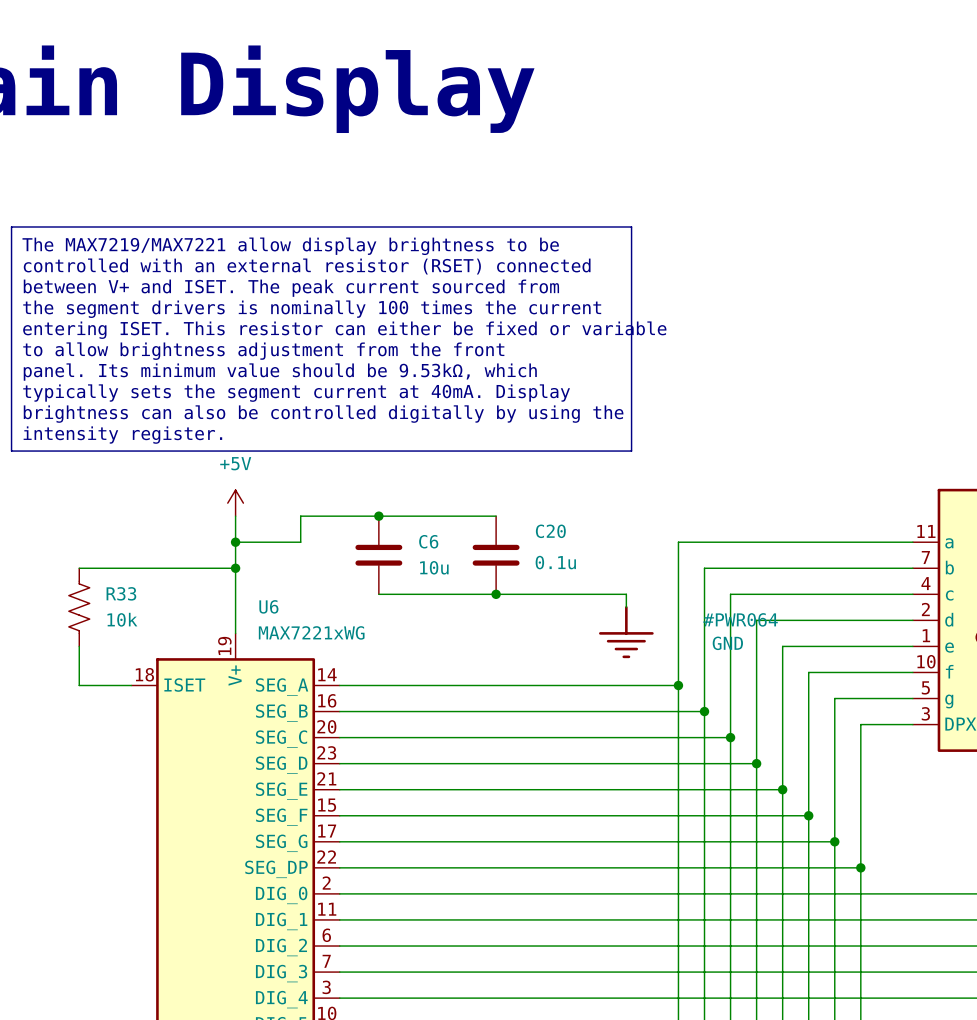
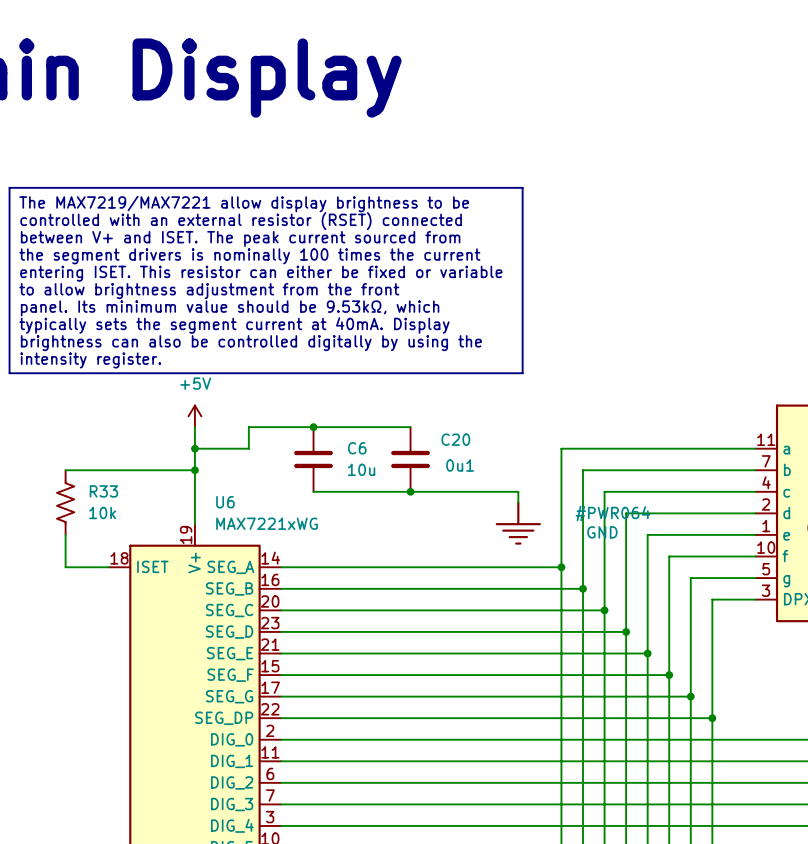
C20 value: 0.1u (555, 562) -> 0u1 (460, 465)

